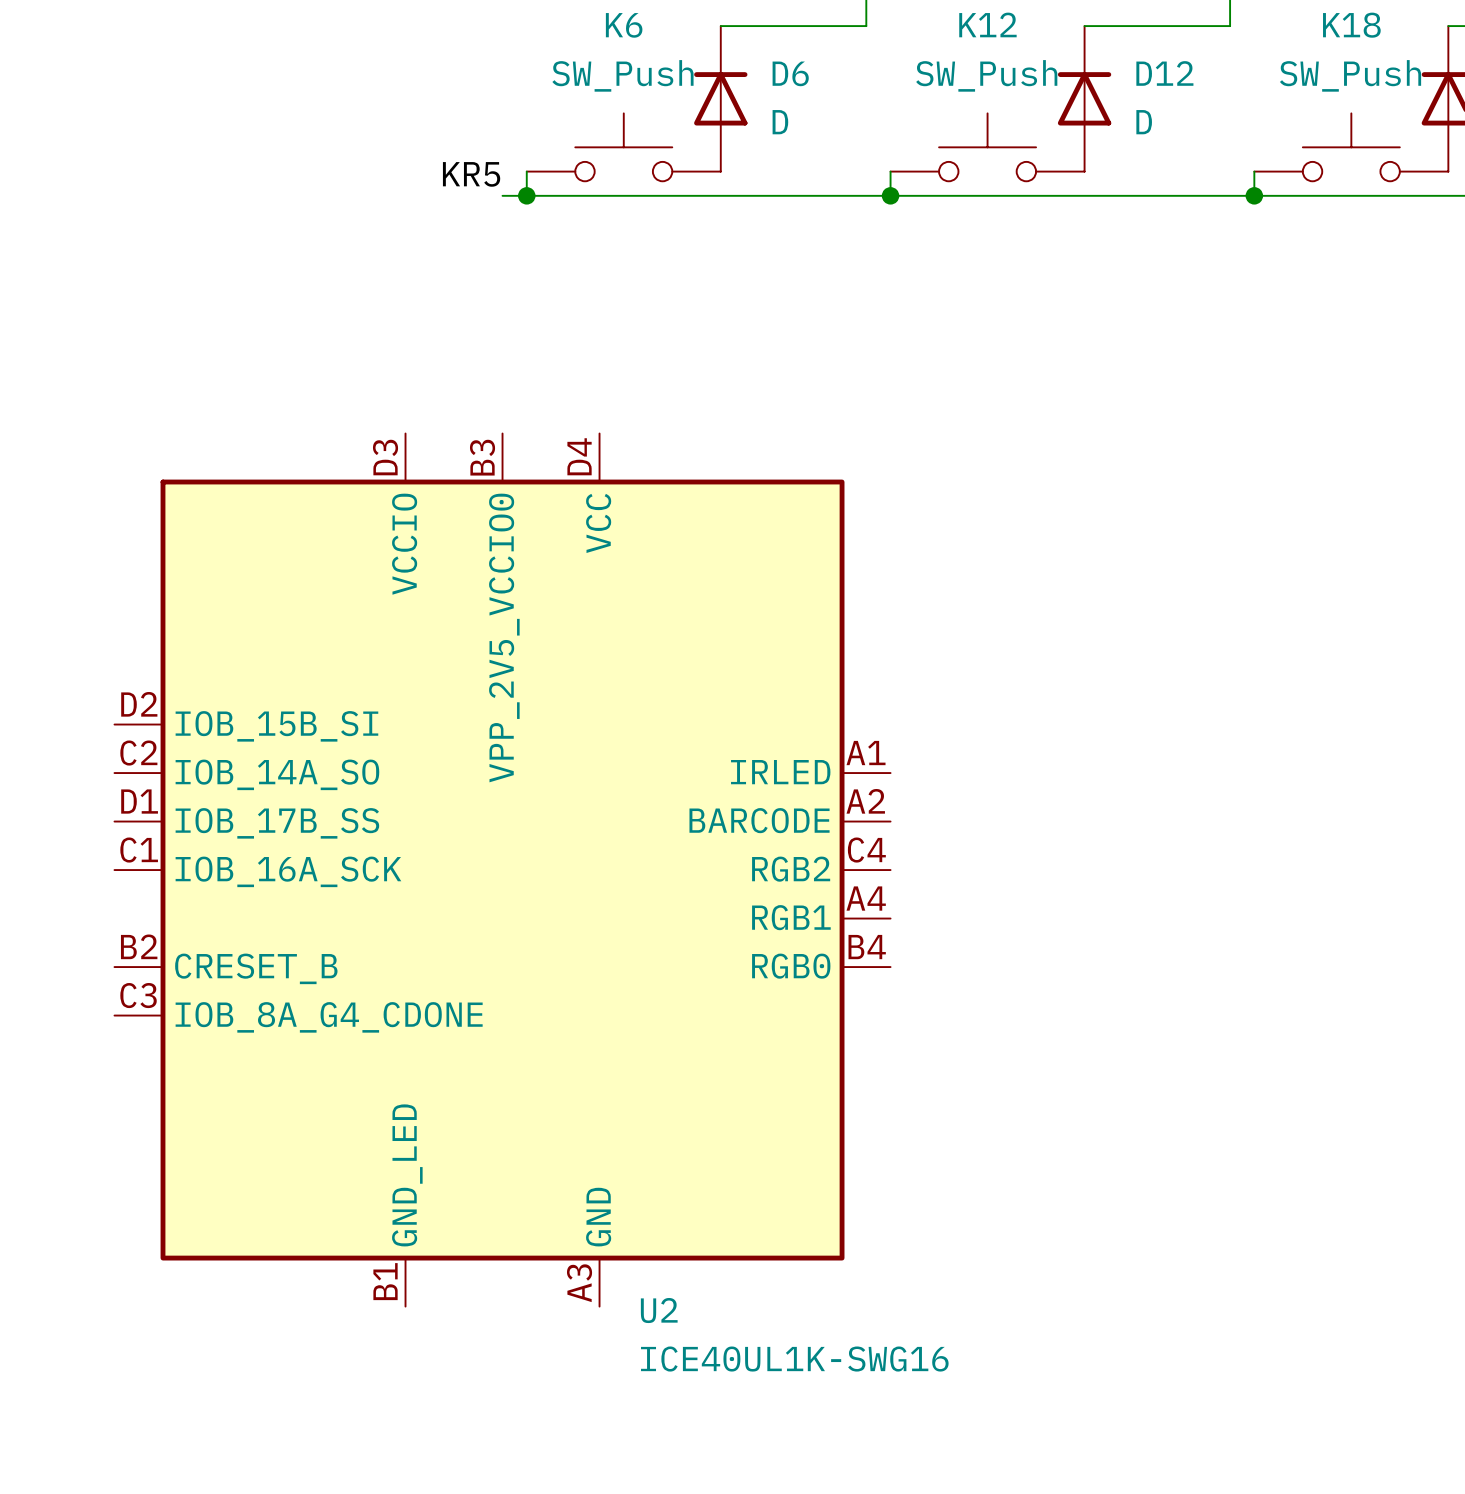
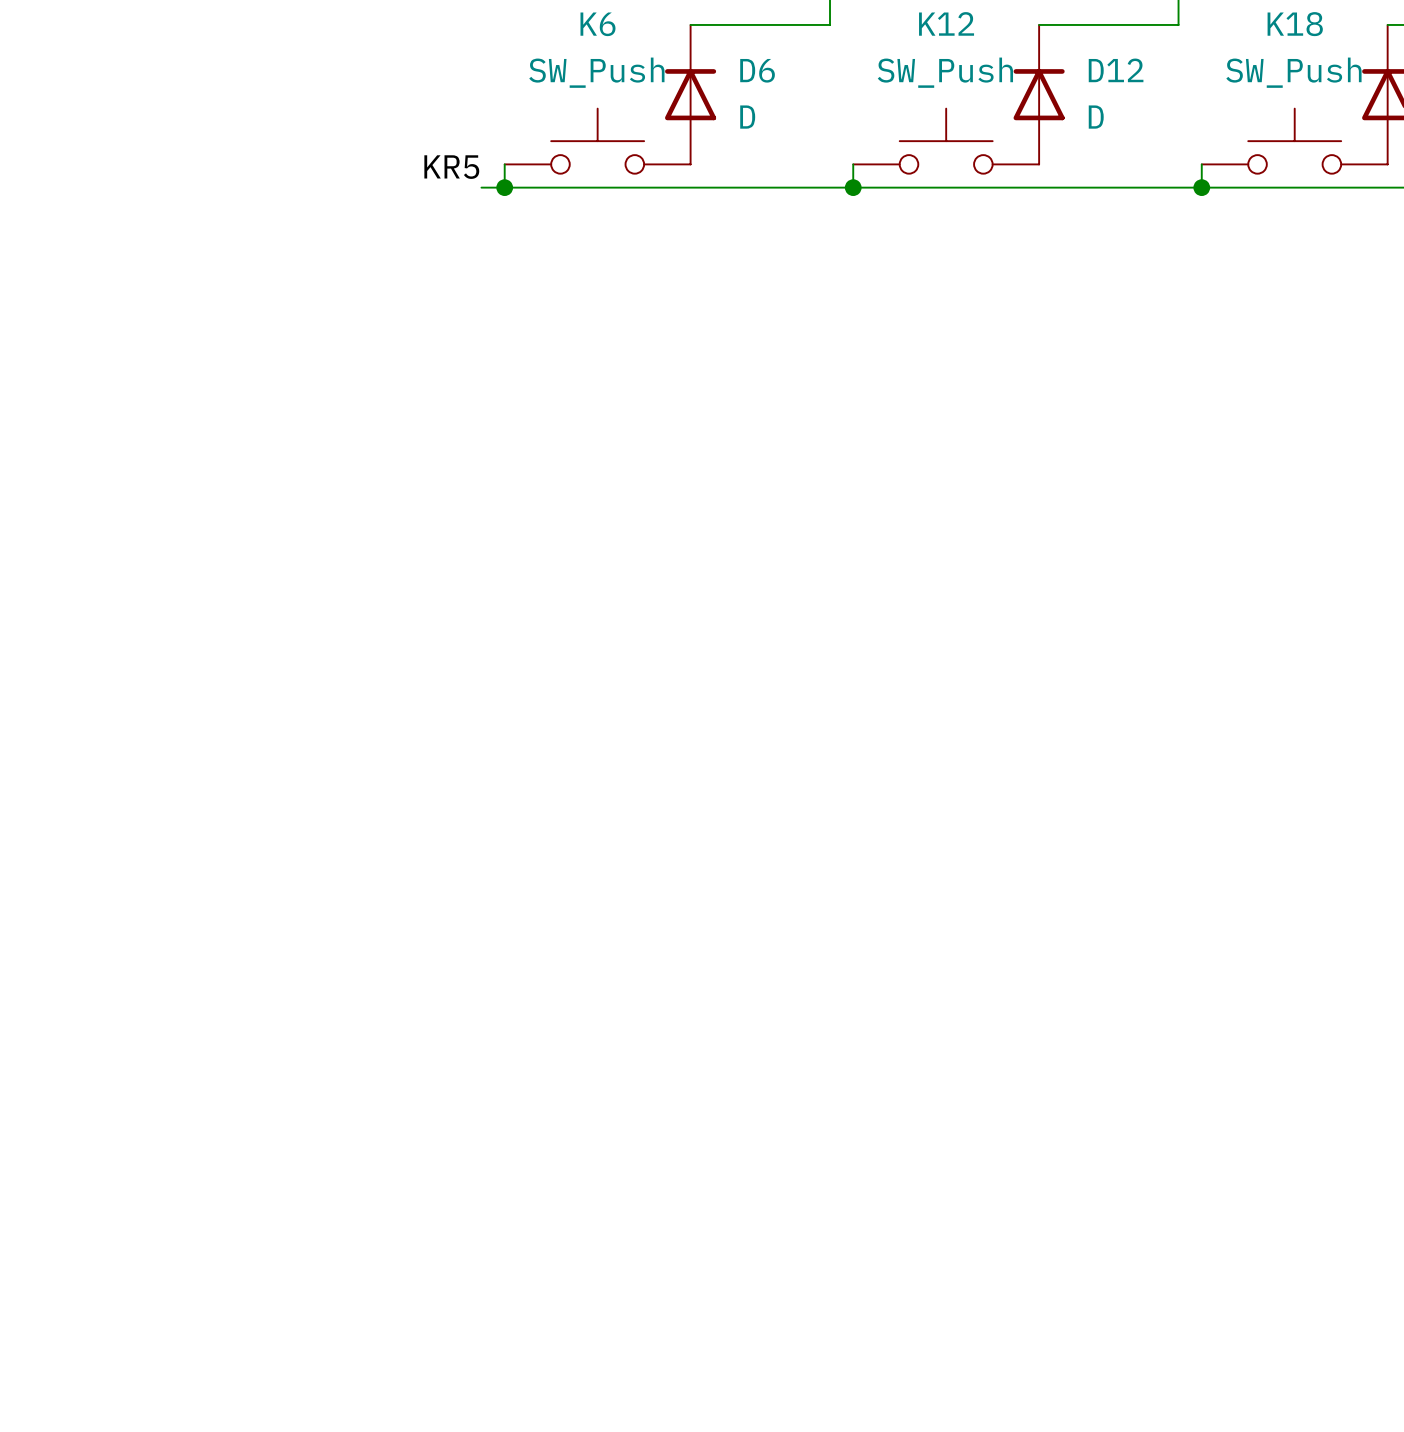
U2: ICE40UL1K-SWG16 (502, 870) -> none

